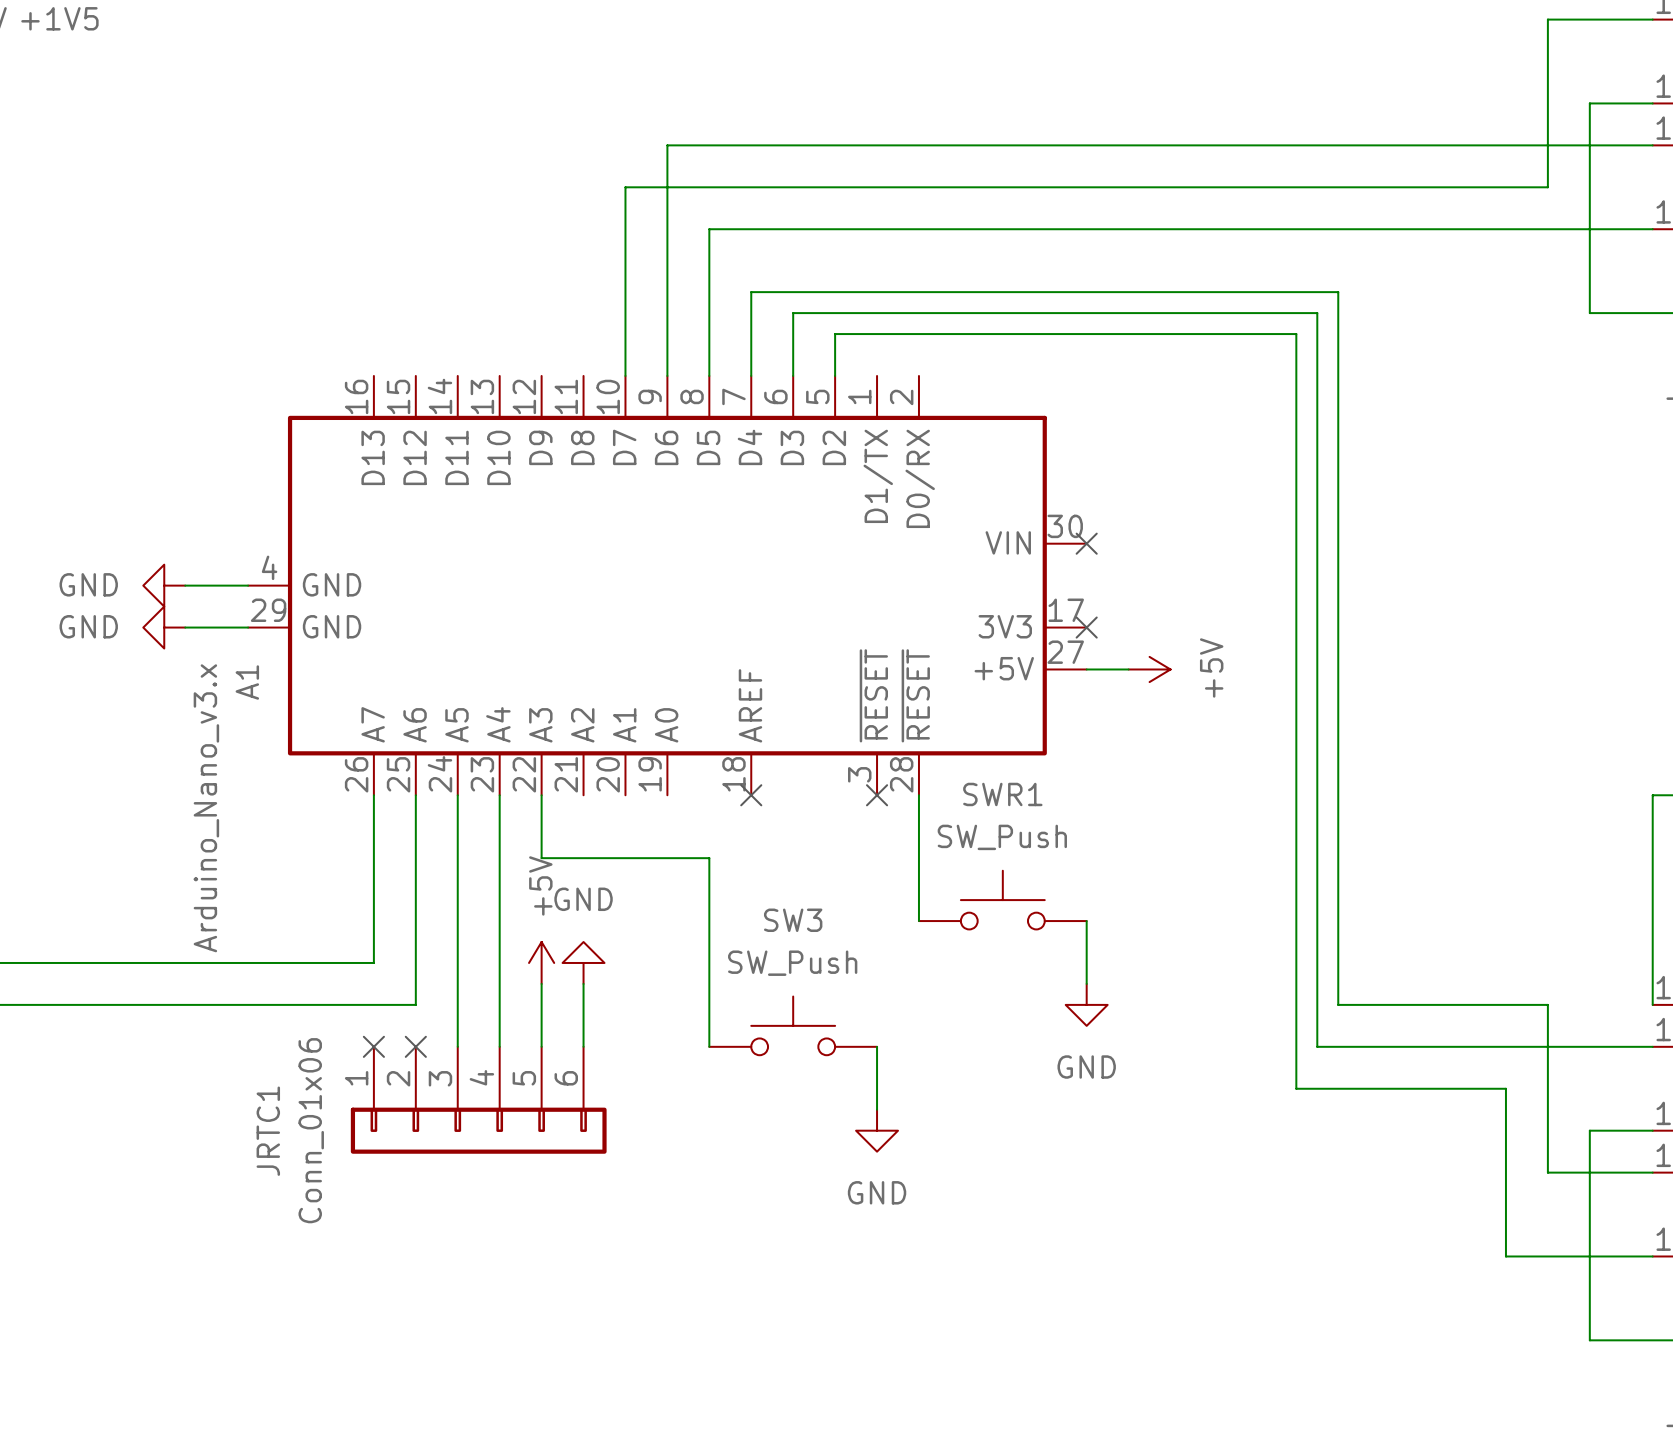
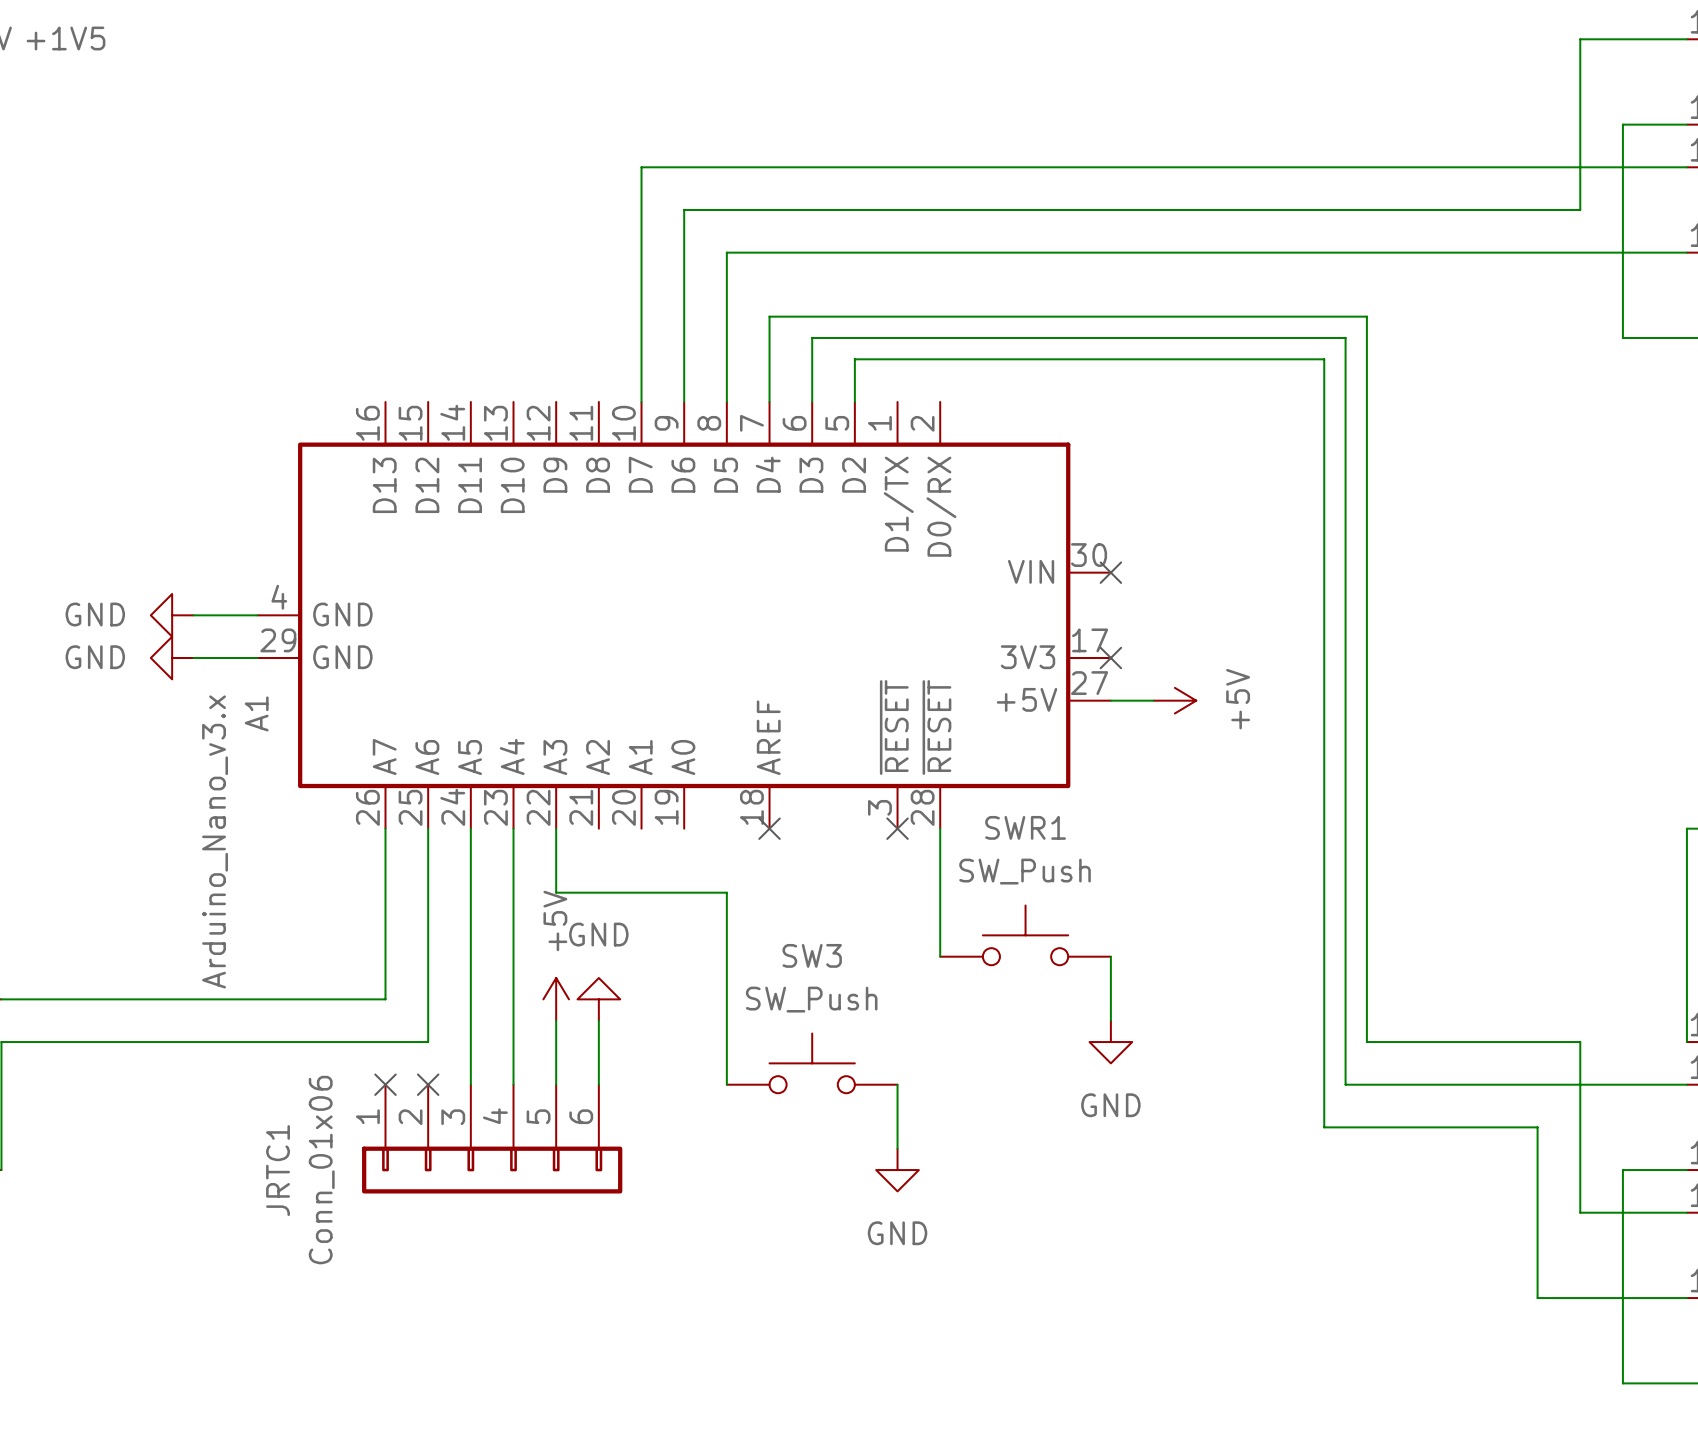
wire: (667, 145) (667, 187) (625, 187) -> (684, 167) (641, 167) (641, 209)

